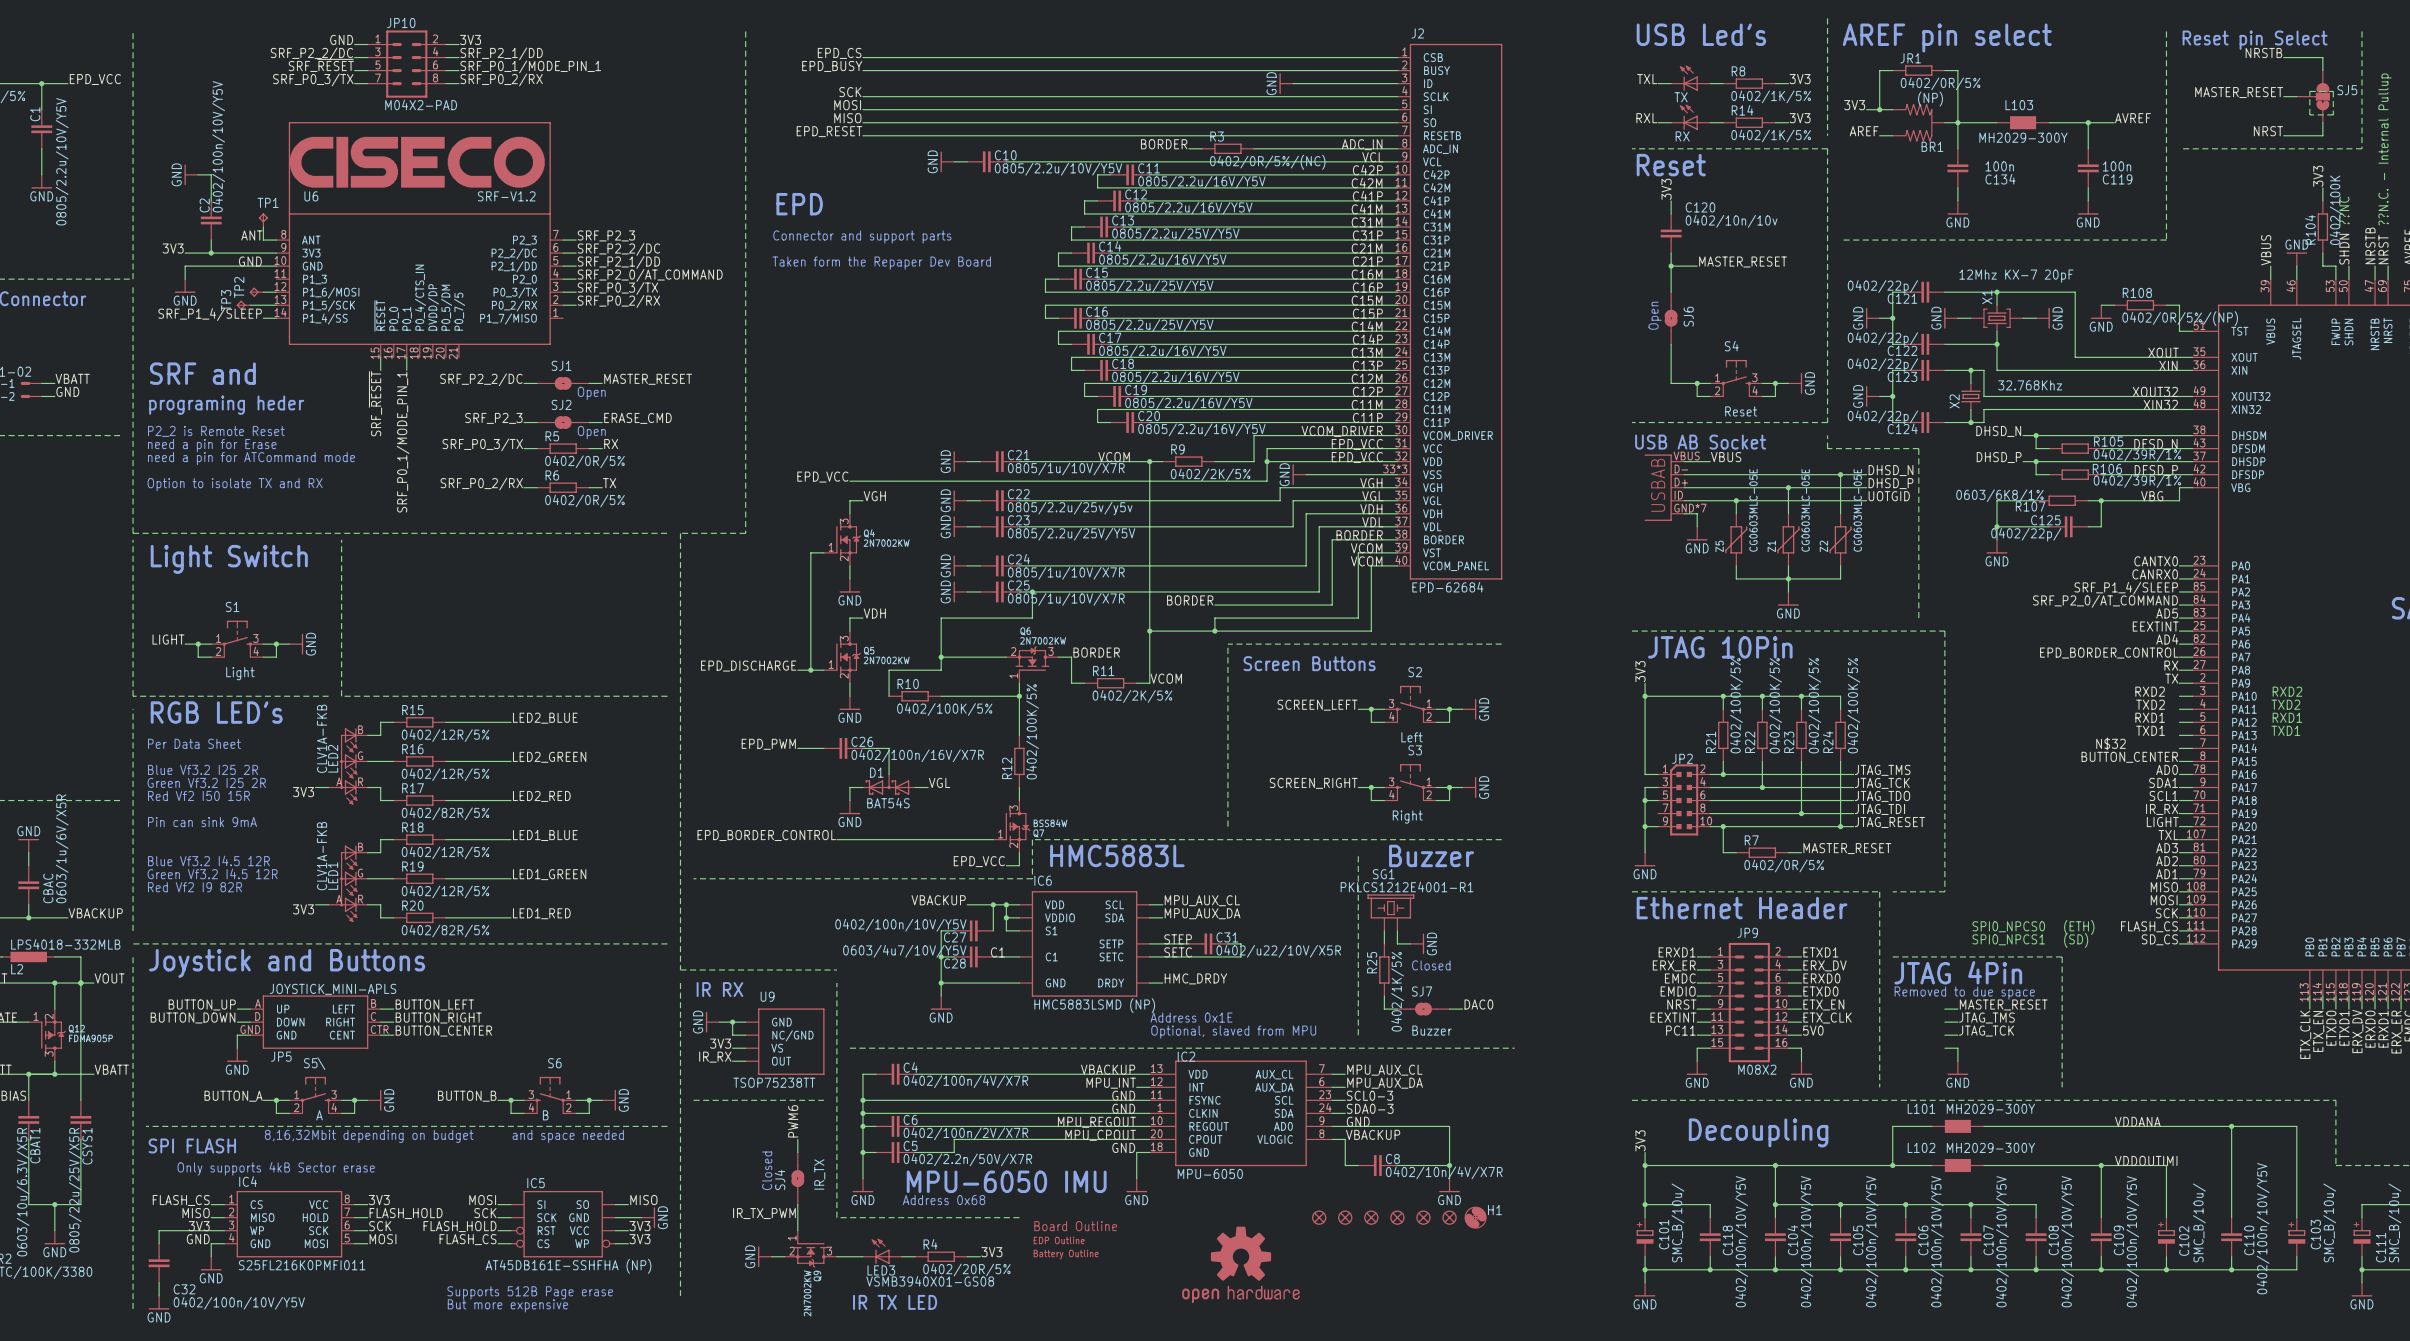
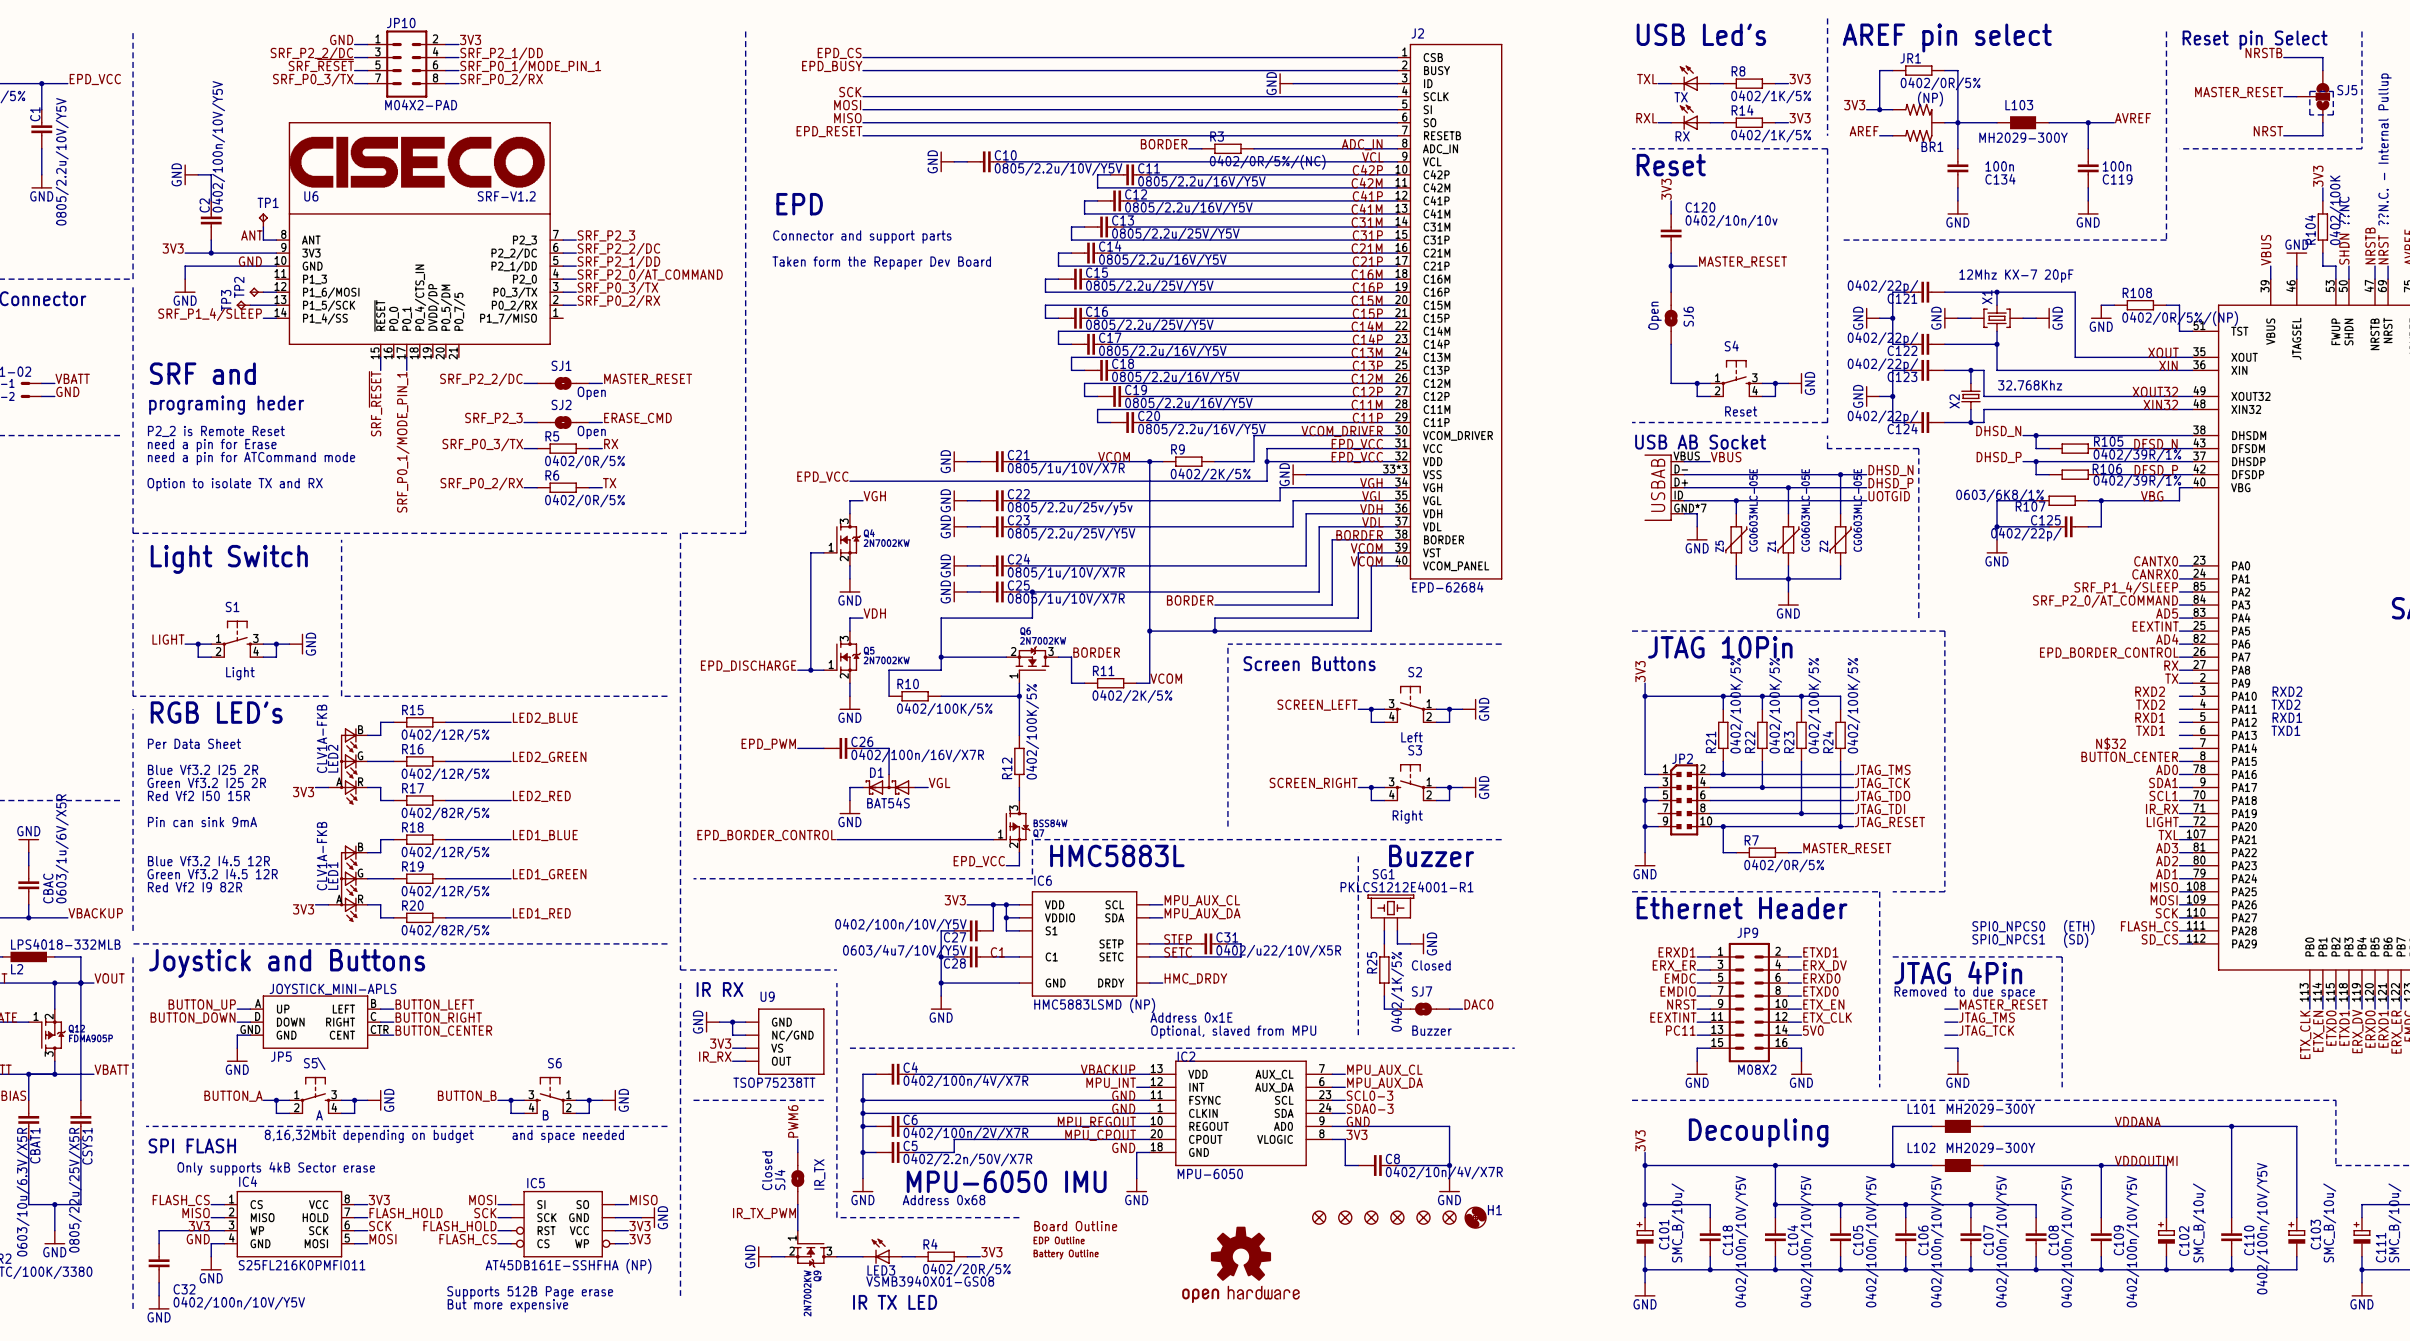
label: VBACKUP (938, 900) -> 3V3 (955, 900)
label: VBACKUP (1373, 1134) -> 3V3 (1356, 1134)

